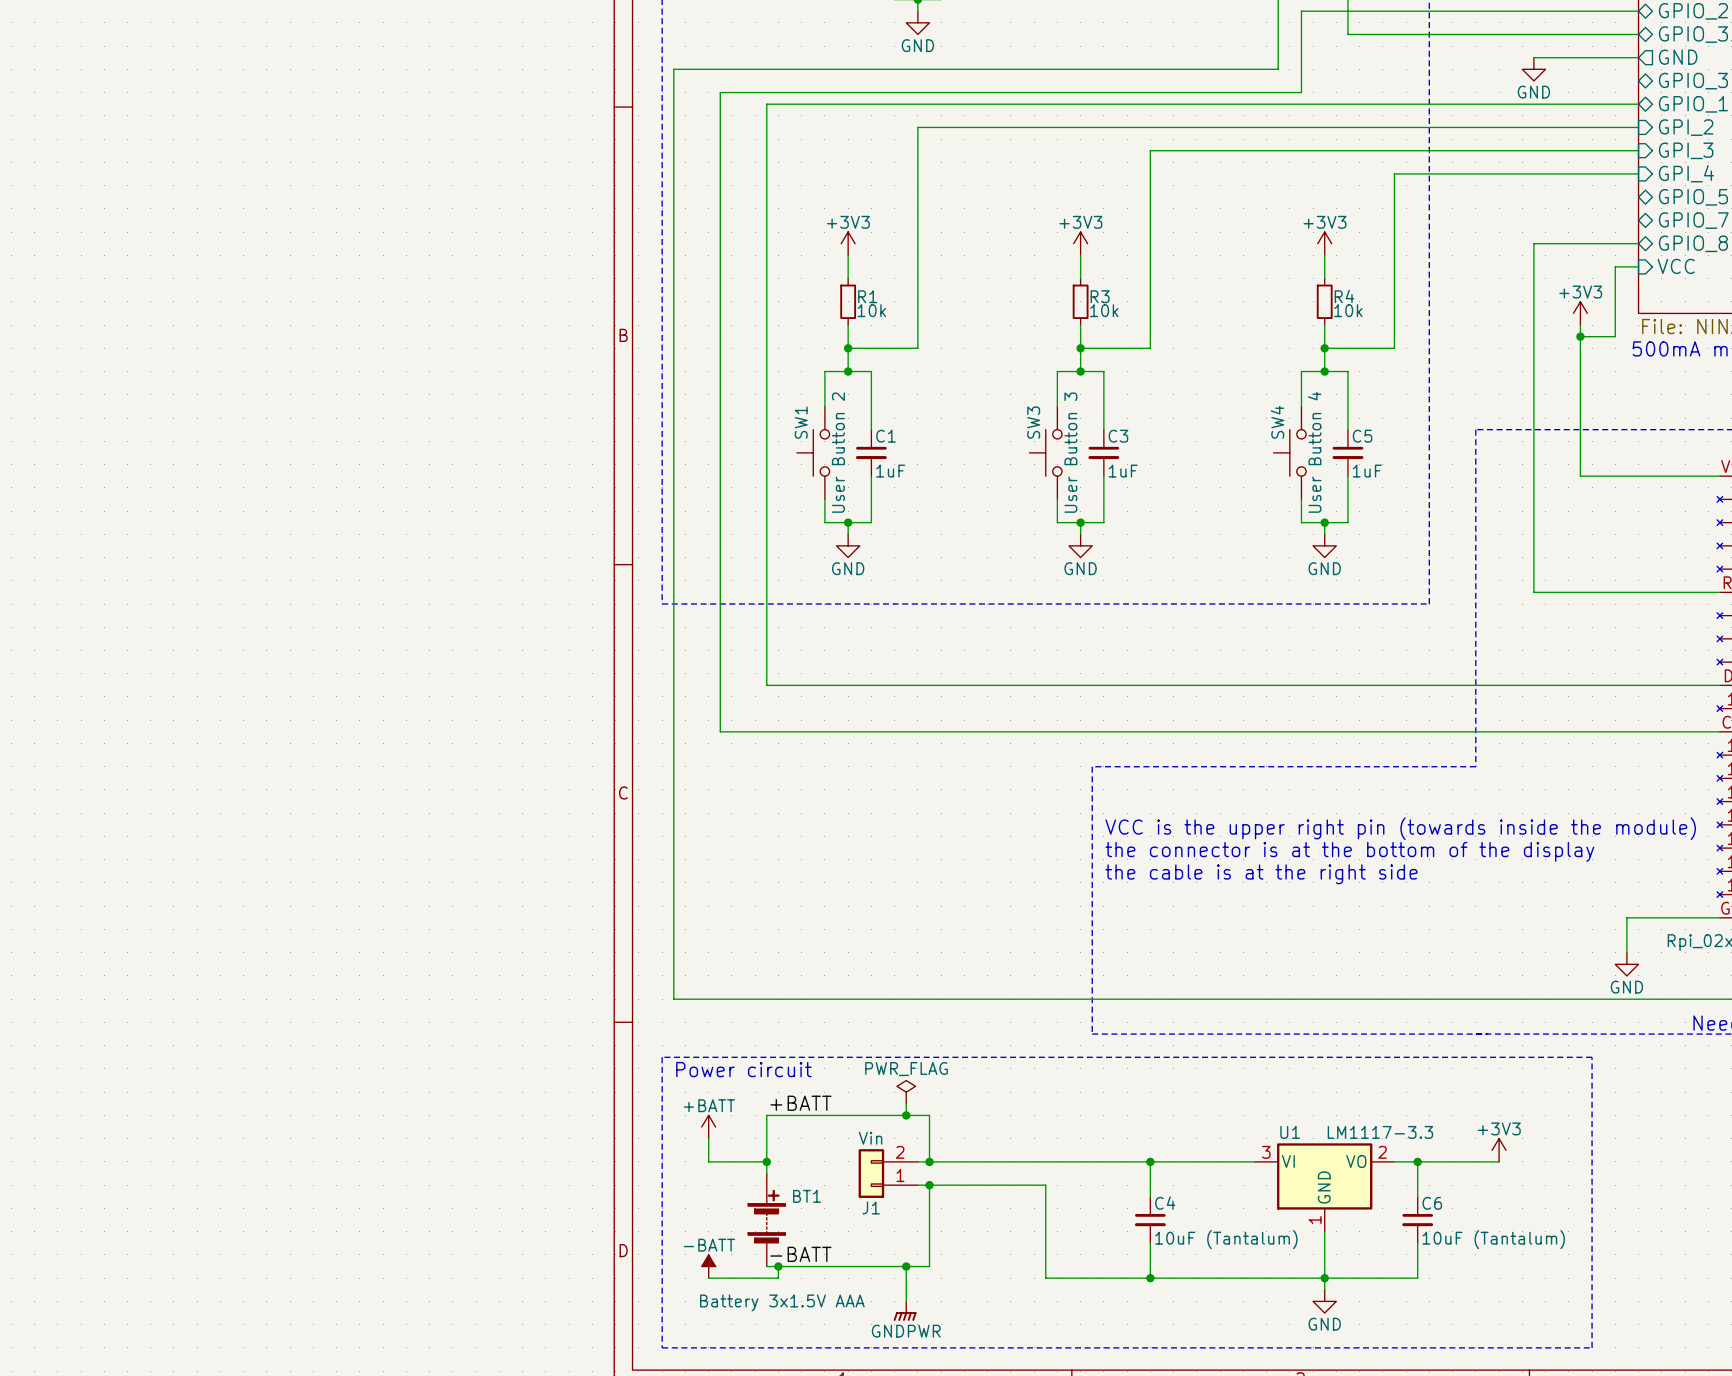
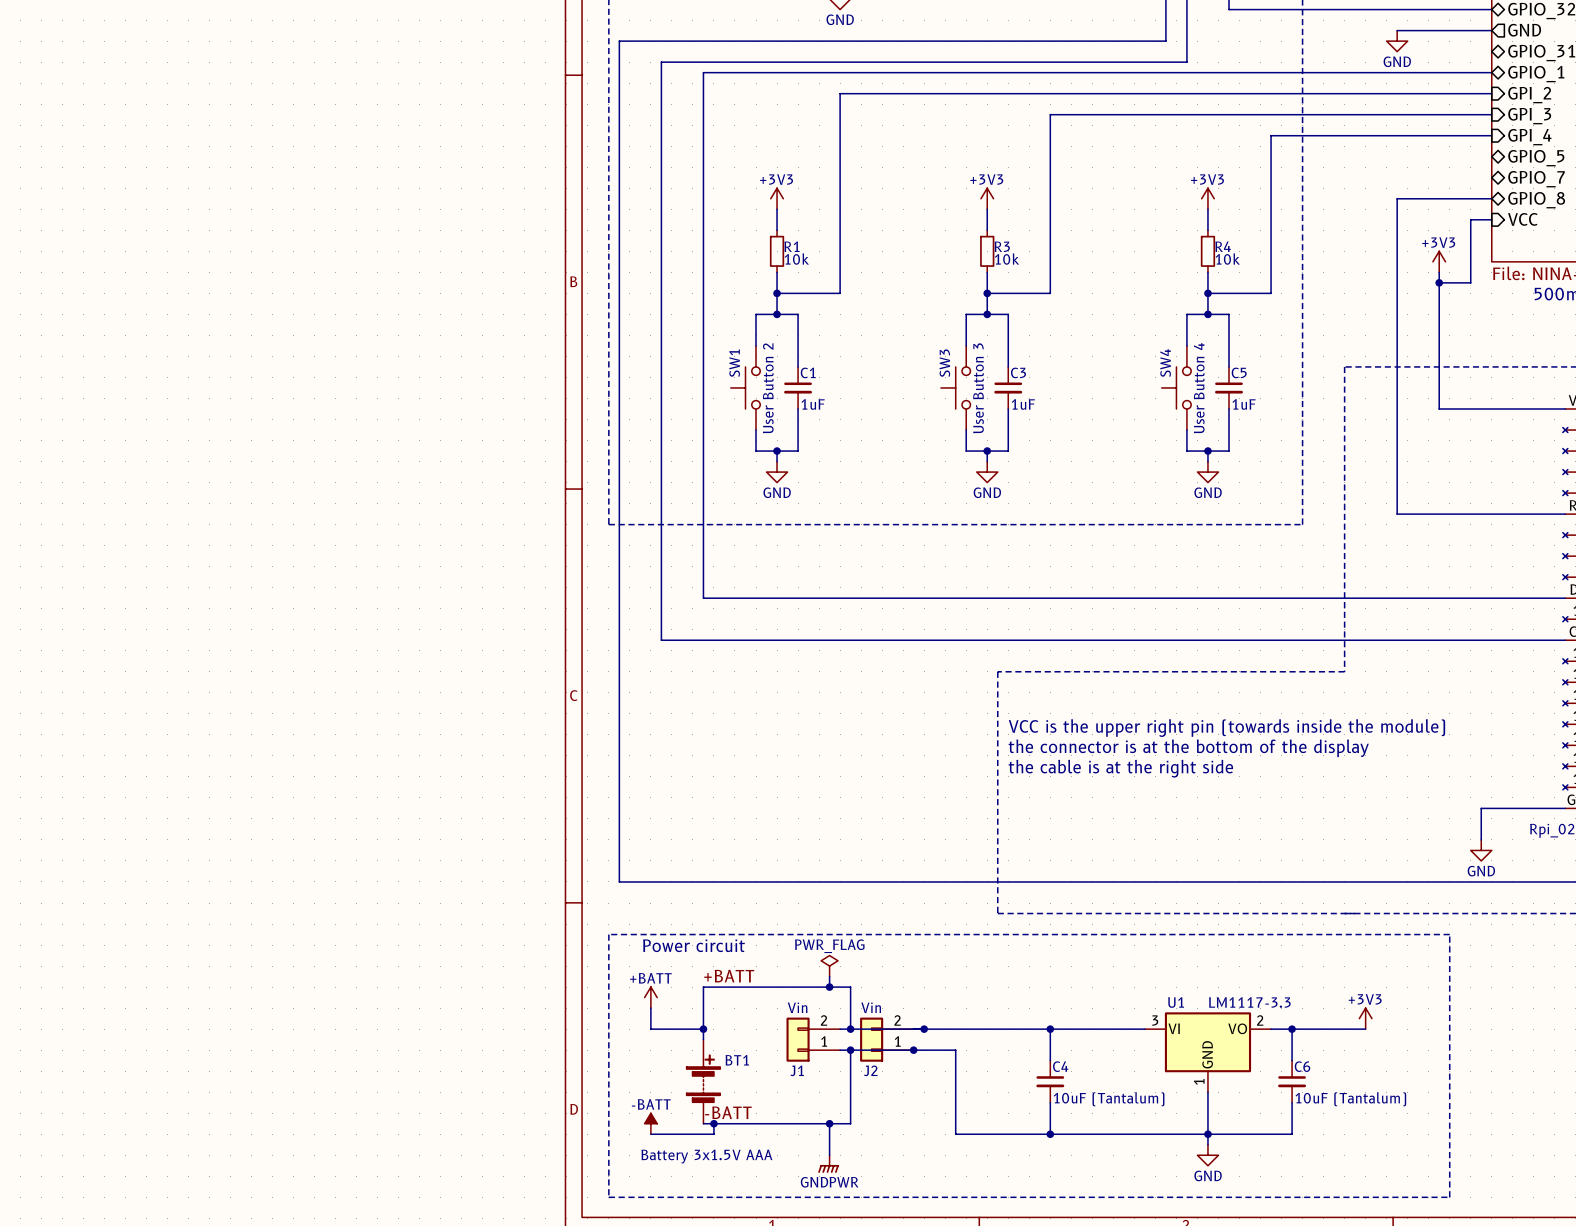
junction: none -> (924, 1029)
J2: none -> Vin (886, 1039)
junction: none -> (913, 1050)

